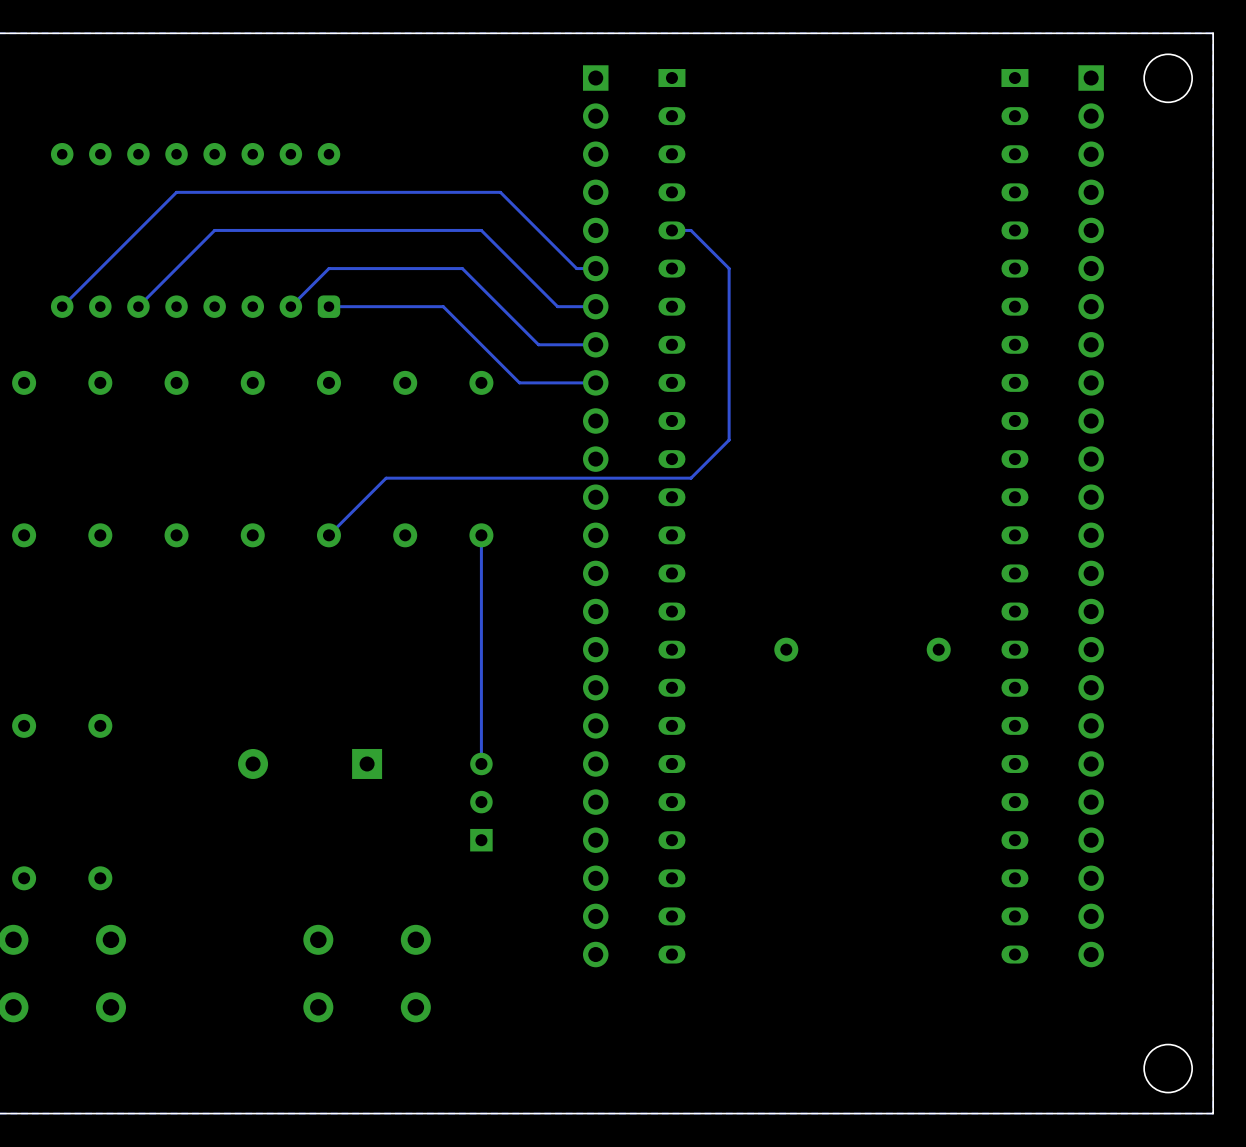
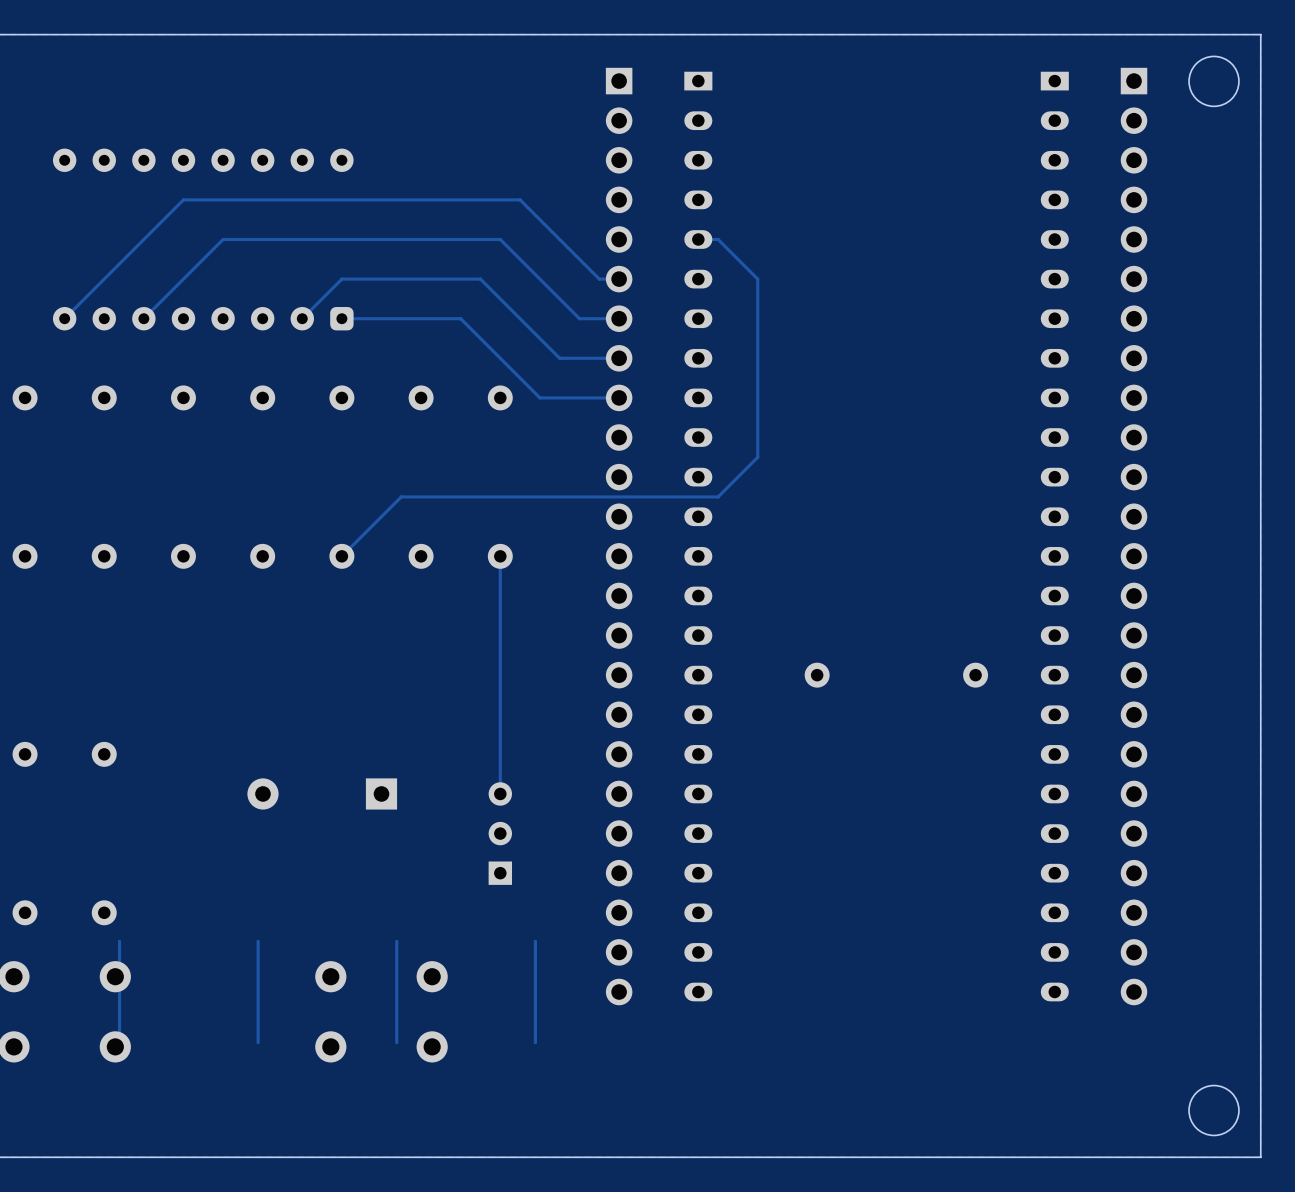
track: none -> (119, 941) (119, 1042)
track: none -> (258, 941) (258, 1042)
track: none -> (396, 941) (396, 1042)
track: none -> (535, 941) (535, 1042)

